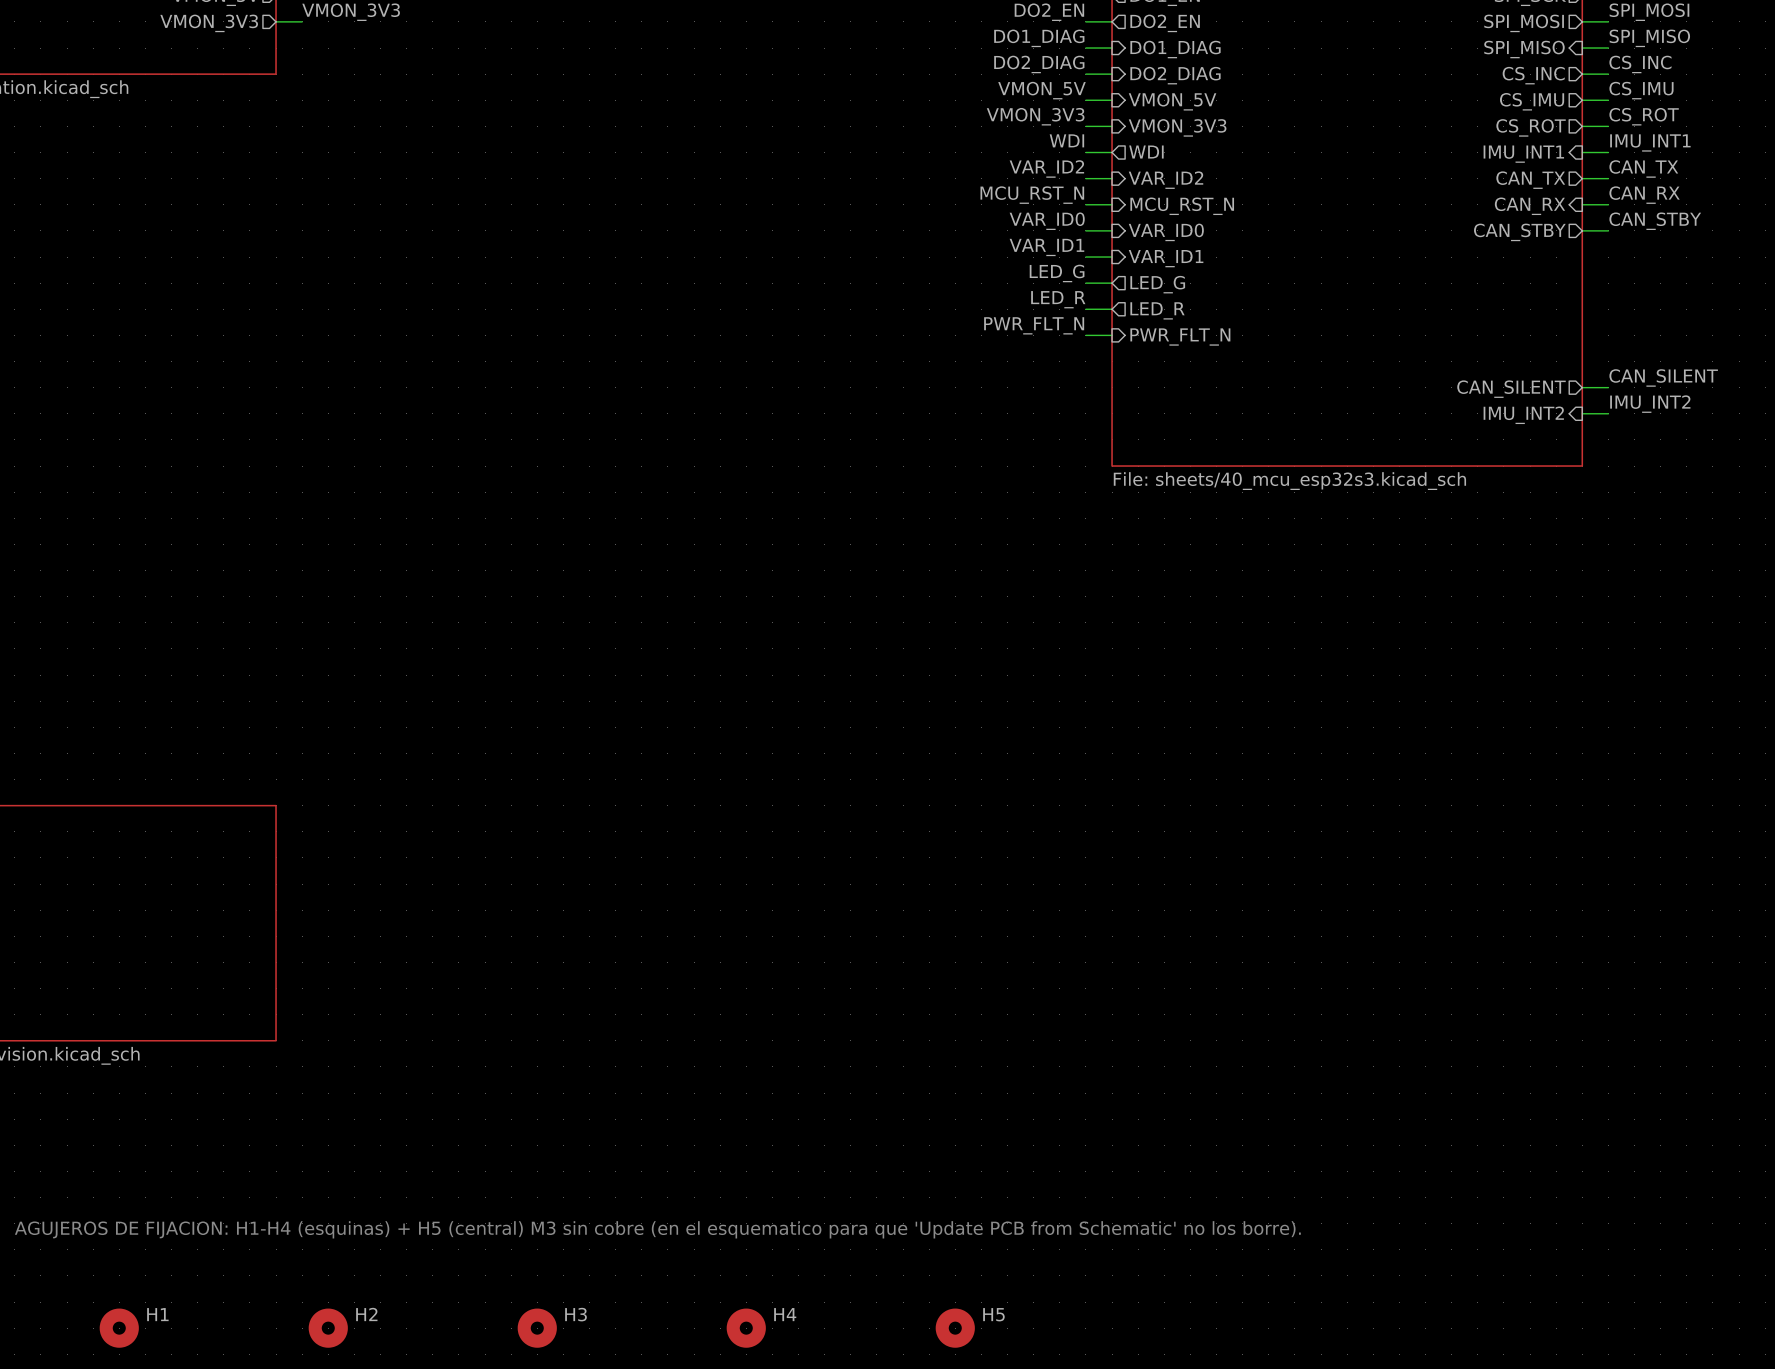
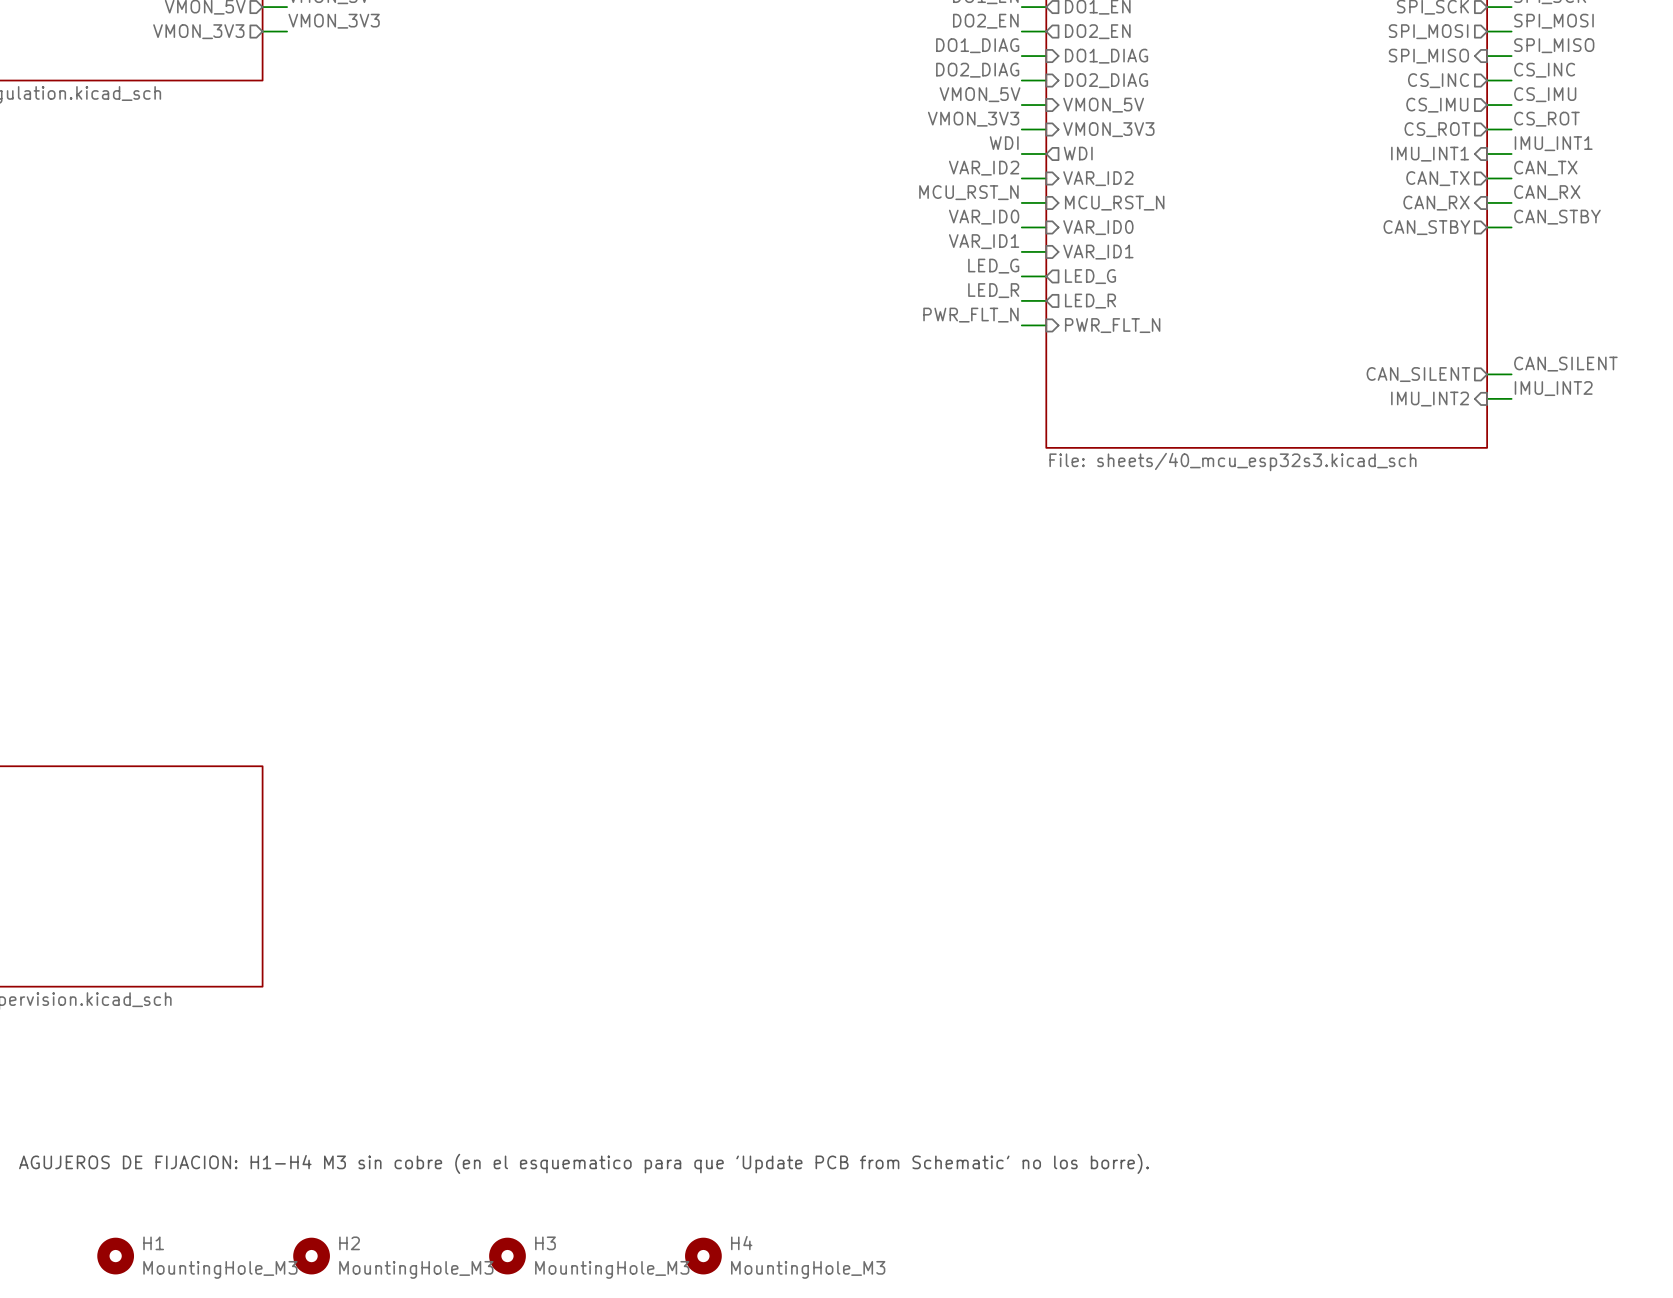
text: AGUJEROS DE FIJACION: H1-H4 (esquinas) + H5 (central) M3 sin cobre (en el esquematico para que 'Update PCB from Schematic' no los borre). (657, 1229) -> AGUJEROS DE FIJACION: H1-H4 M3 sin cobre (en el esquematico para que 'Update PCB from Schematic' no los borre). (583, 1163)
H5: (955, 1328) -> none
H1 value: none -> MountingHole_M3 (220, 1269)
H2 value: none -> MountingHole_M3 (416, 1269)
H3 value: none -> MountingHole_M3 (612, 1269)
H4 value: none -> MountingHole_M3 (808, 1269)

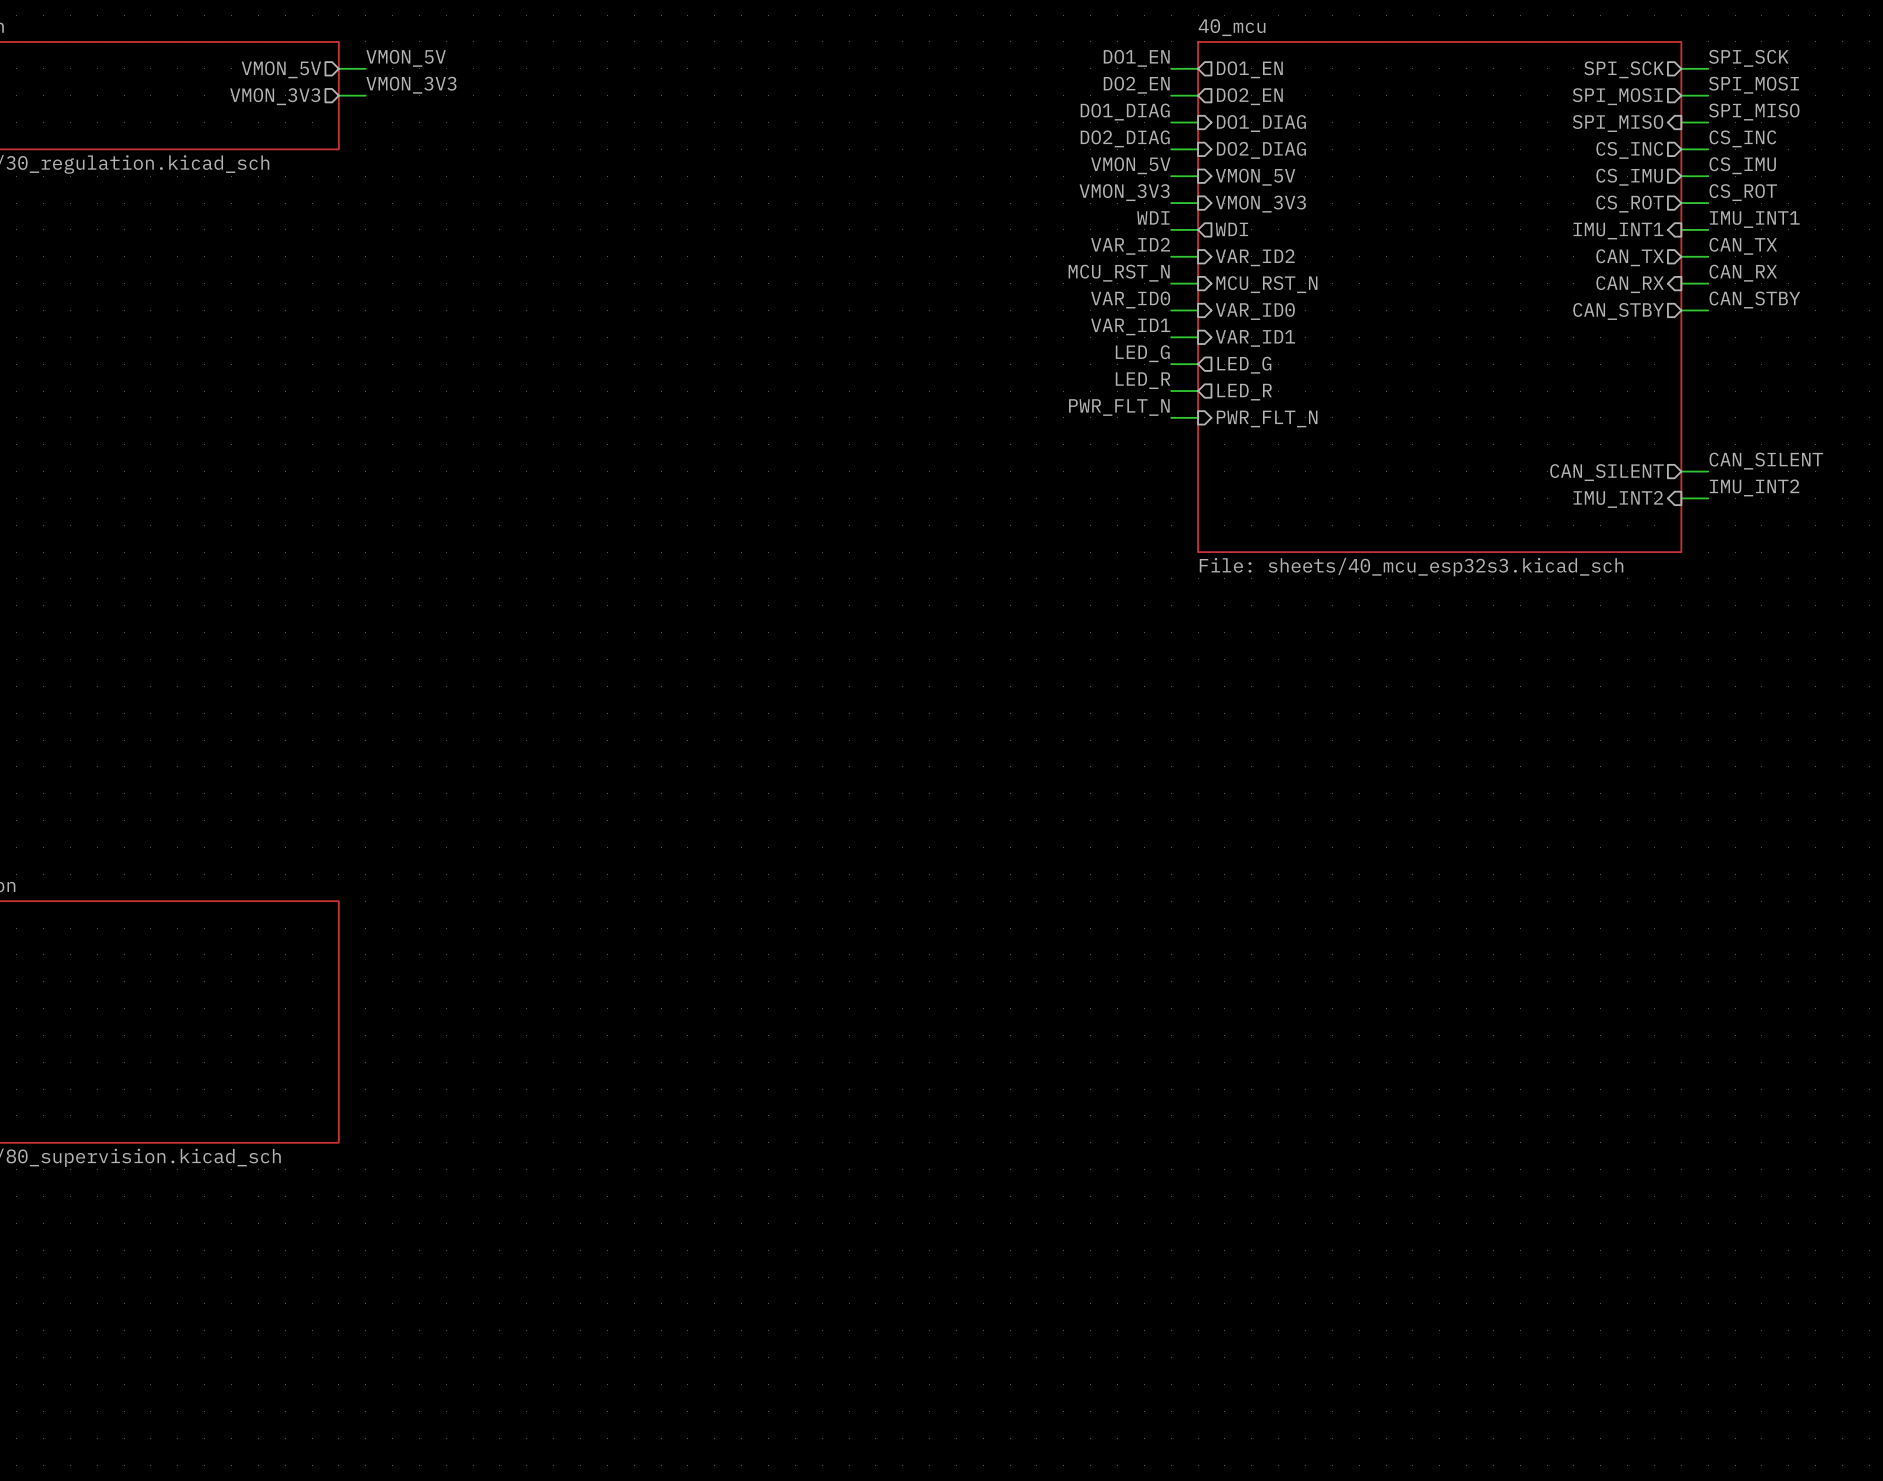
text: AGUJEROS DE FIJACION: H1-H4 M3 sin cobre (en el esquematico para que 'Update PCB from Schematic' no los borre). (583, 1163) -> none
H1: MountingHole_M3 (115, 1256) -> none
H2: MountingHole_M3 (311, 1256) -> none
H3: MountingHole_M3 (507, 1256) -> none
H4: MountingHole_M3 (703, 1256) -> none

